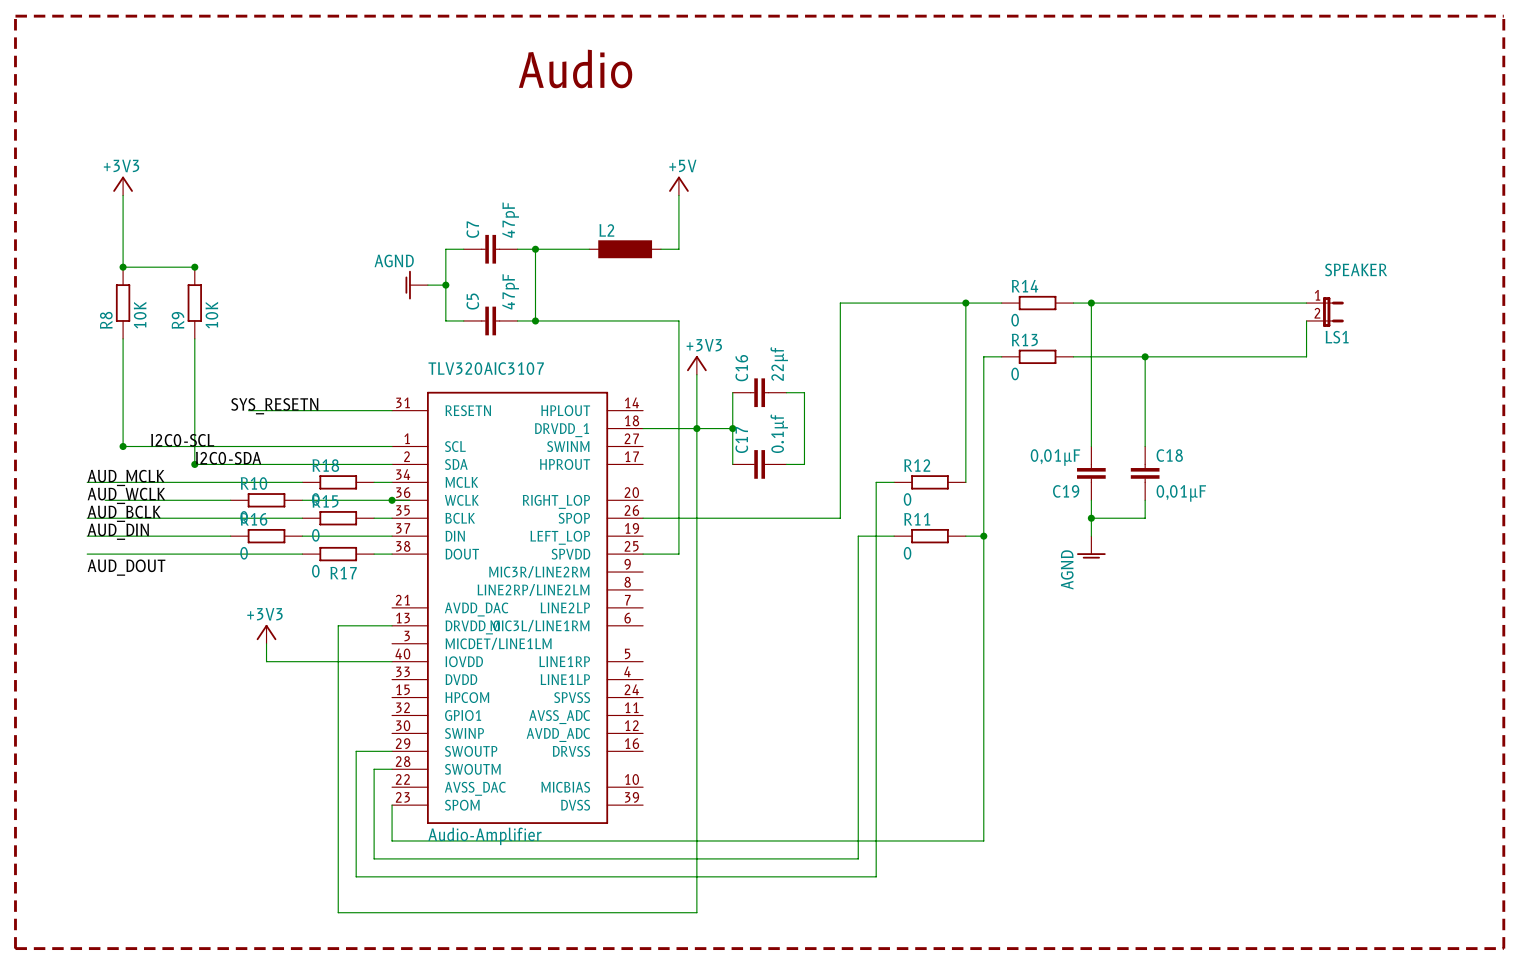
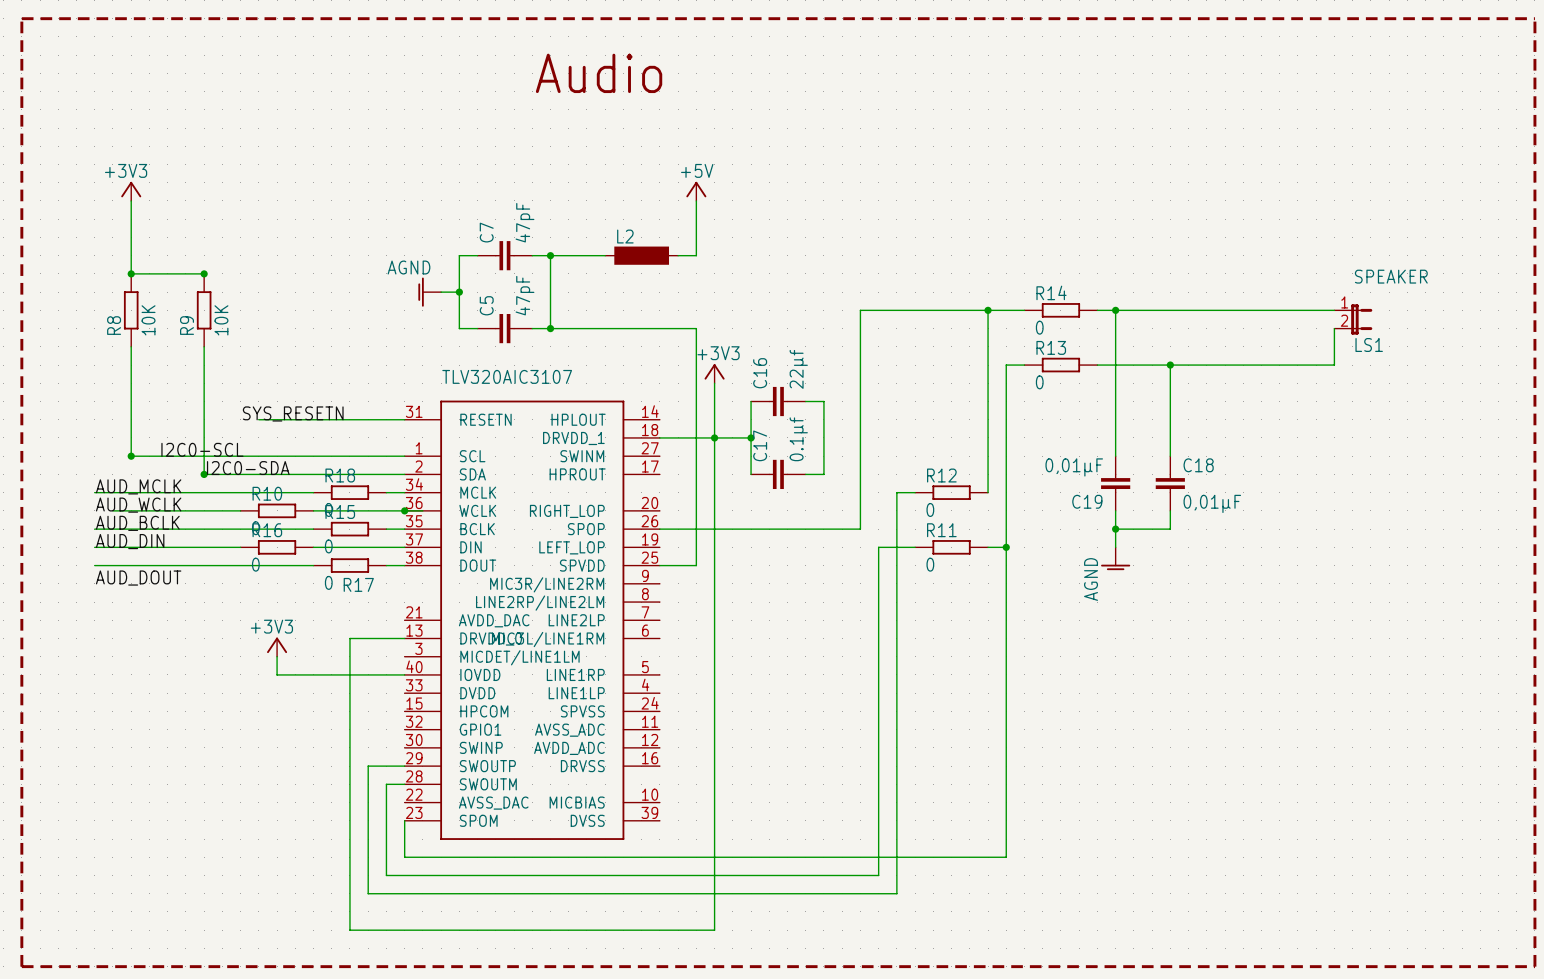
TLV320AIC3107 value: Audio-Amplifier (484, 836) -> none

